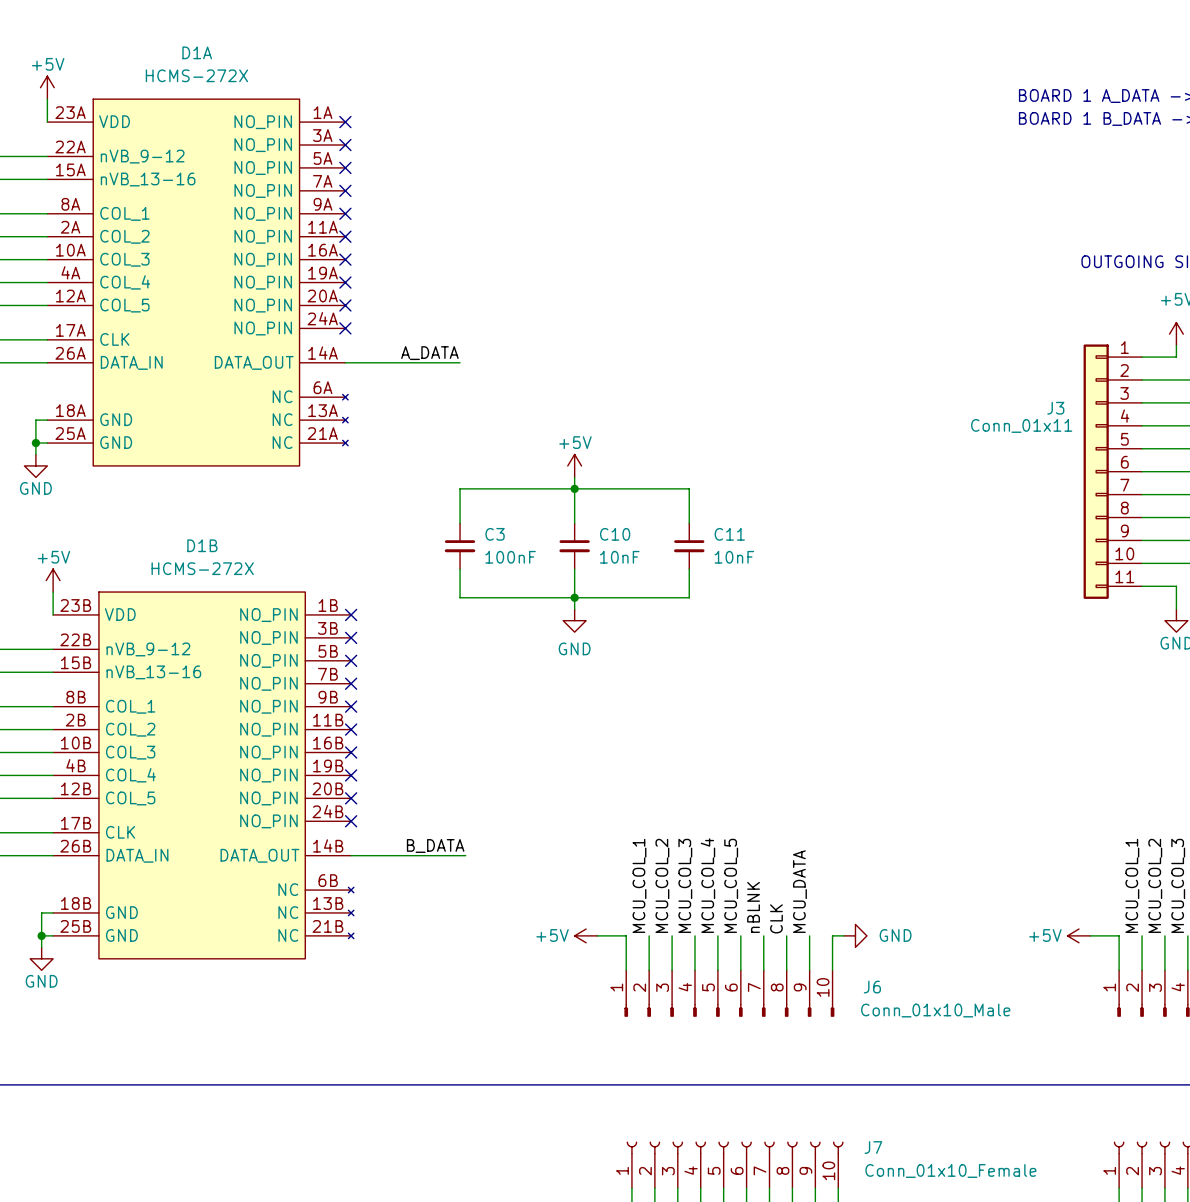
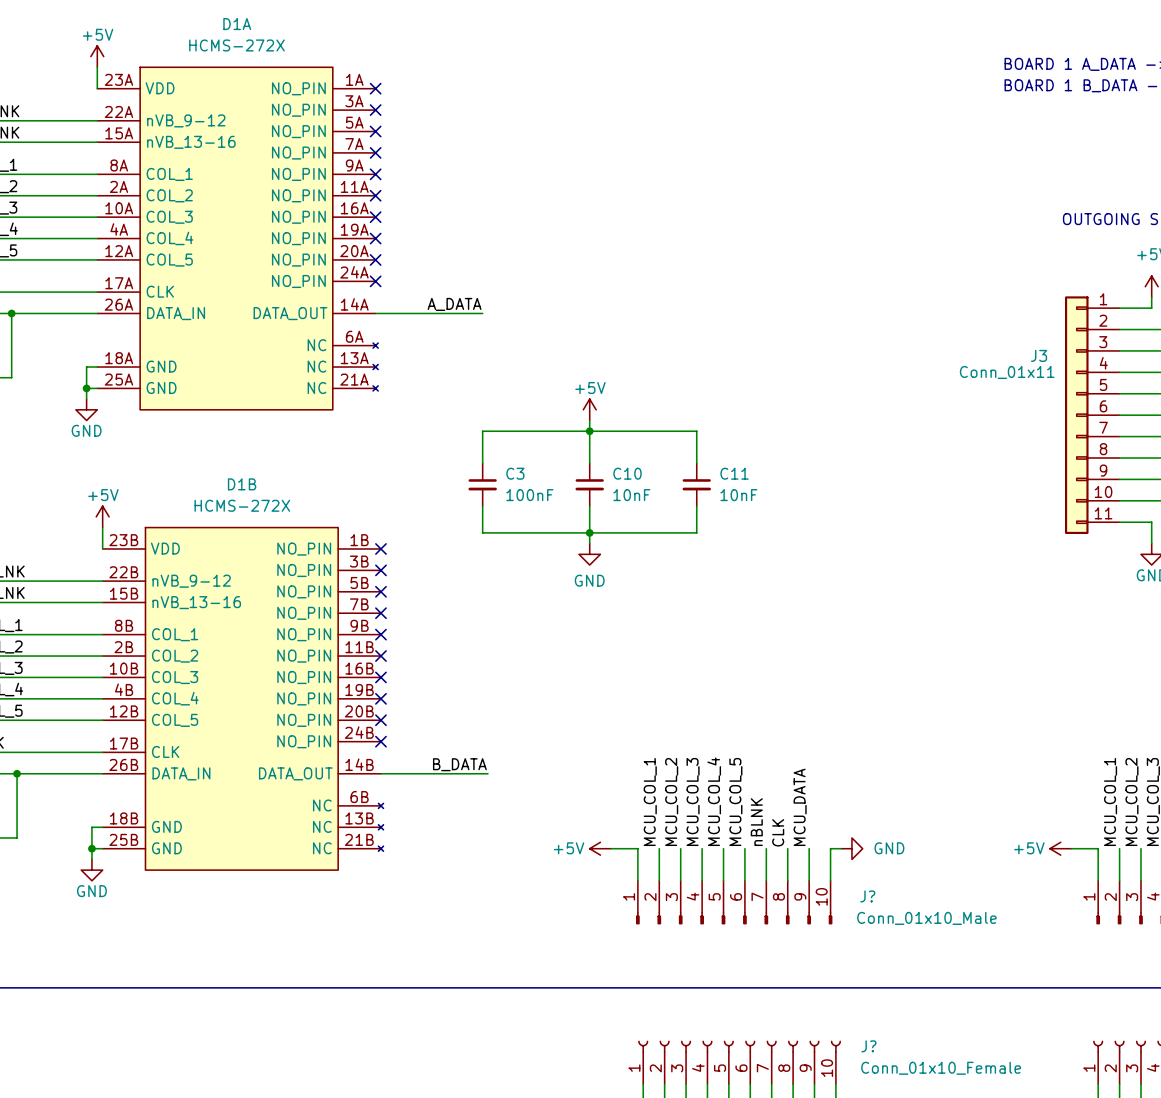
J6 name: J6 (872, 987) -> J? (867, 896)
J7 name: J7 (873, 1147) -> J? (868, 1046)

